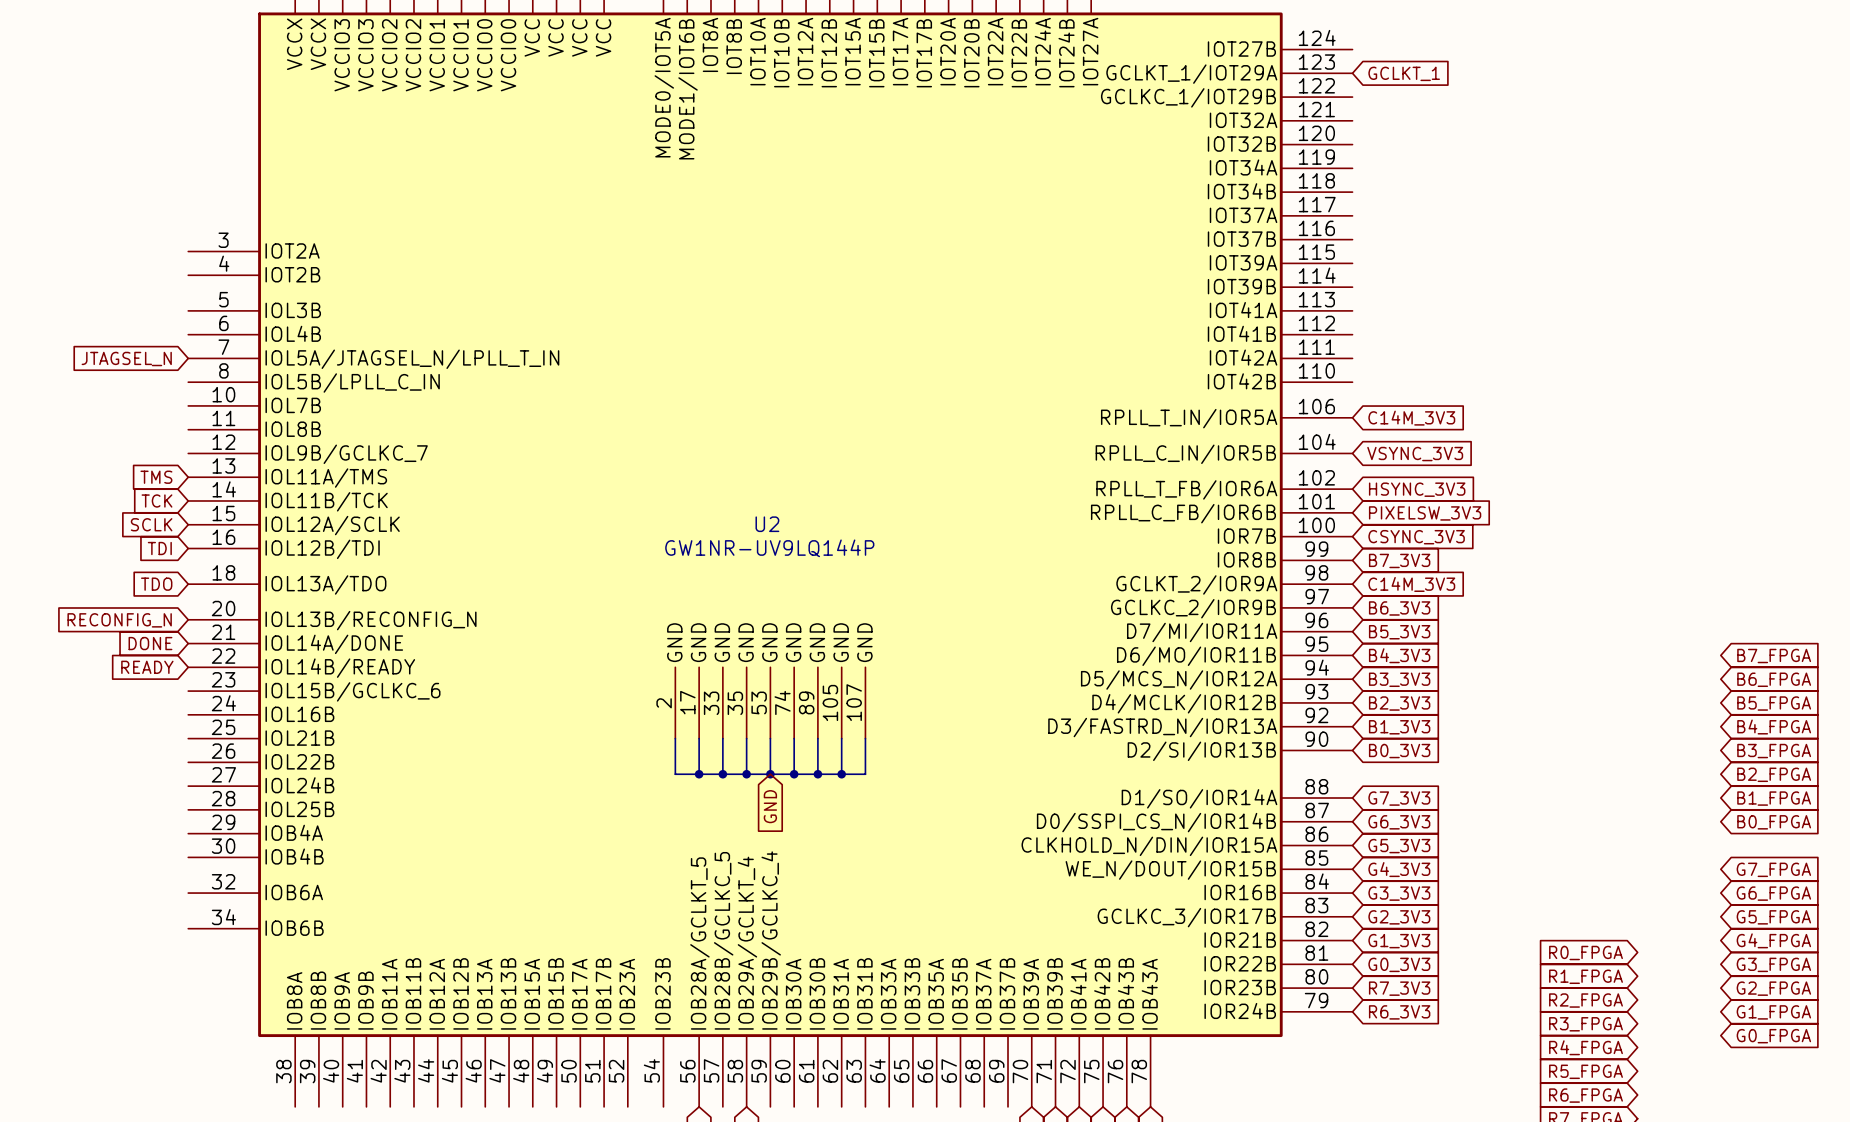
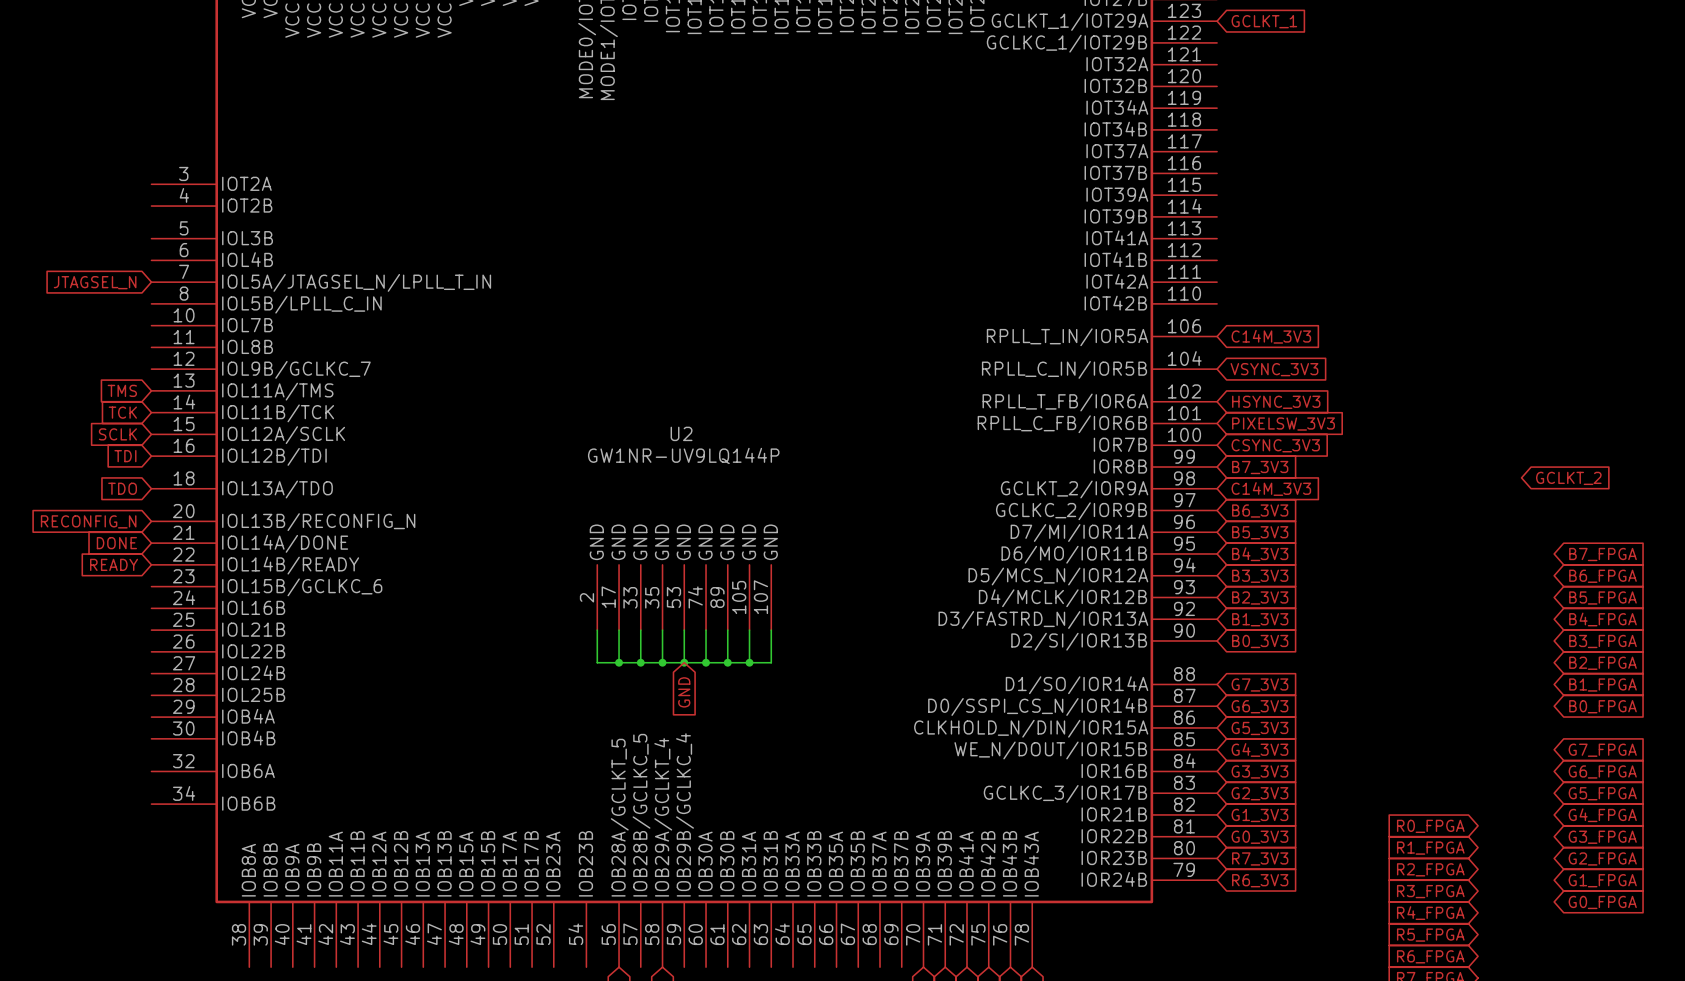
global label: none -> GCLKT_2 (1568, 478)

